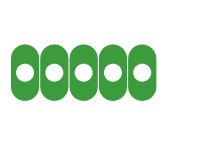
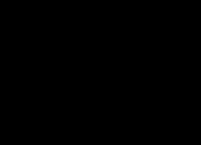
part: (83, 72) -> none

